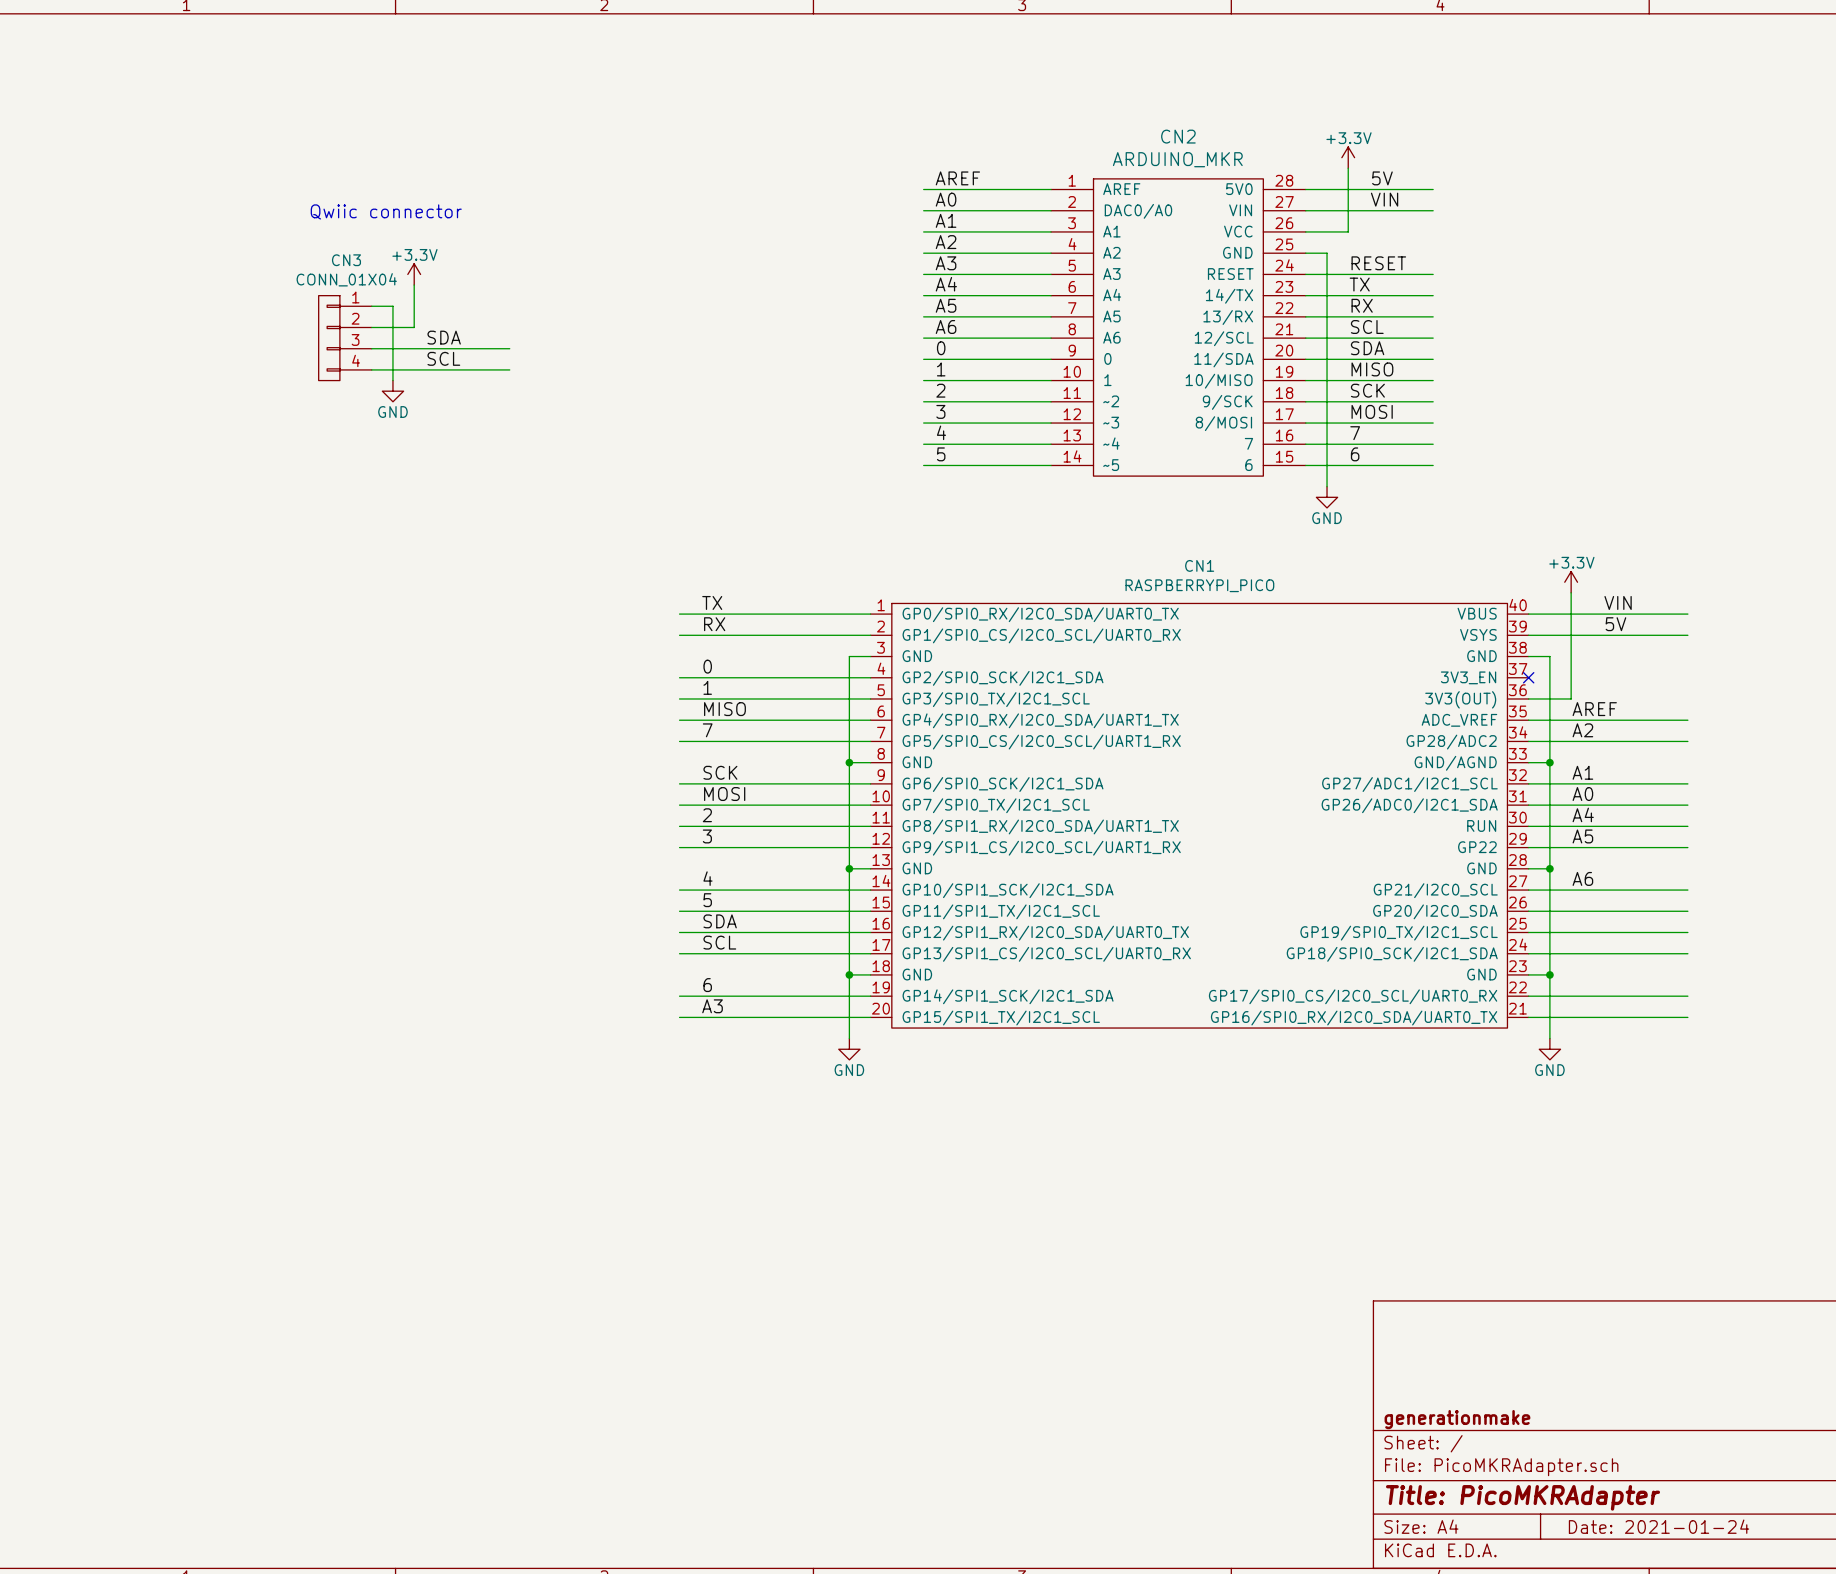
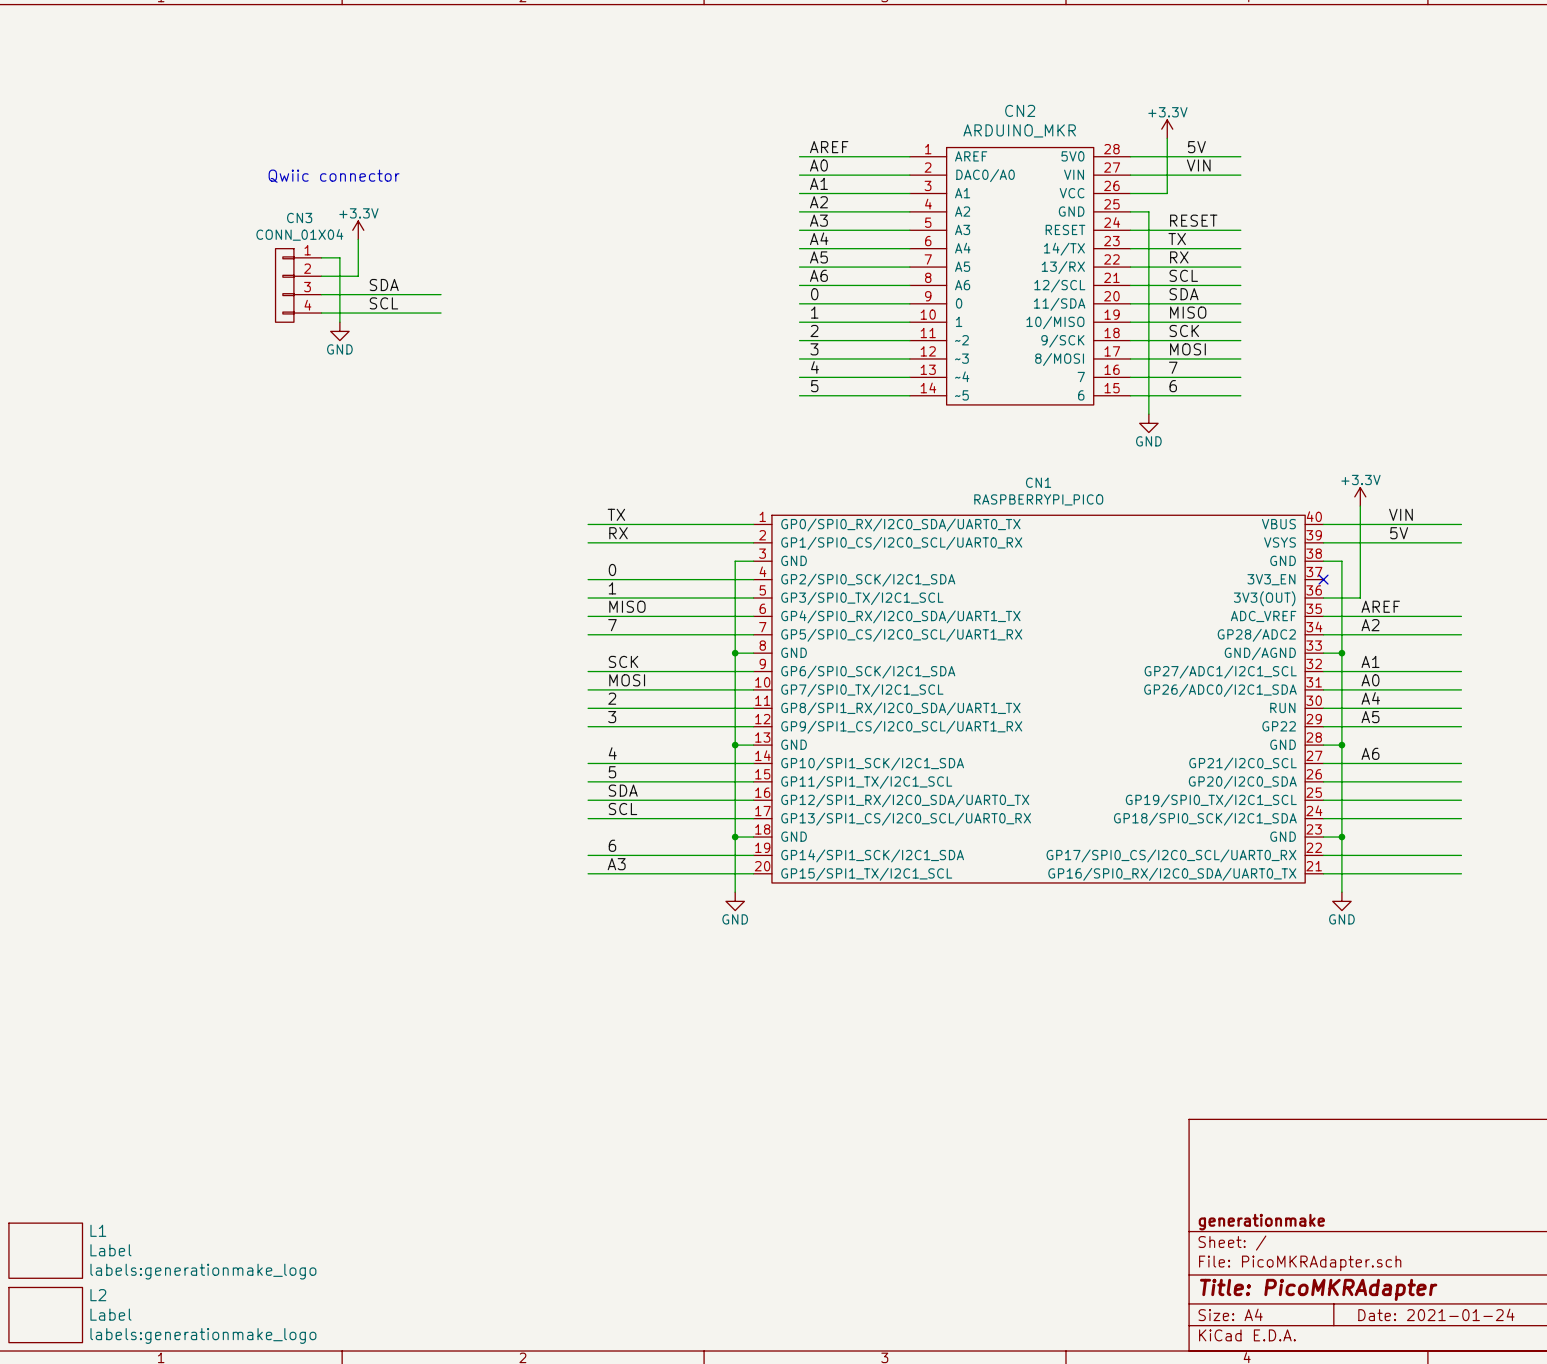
L1: none -> Label (45, 1250)
L2: none -> Label (45, 1315)

